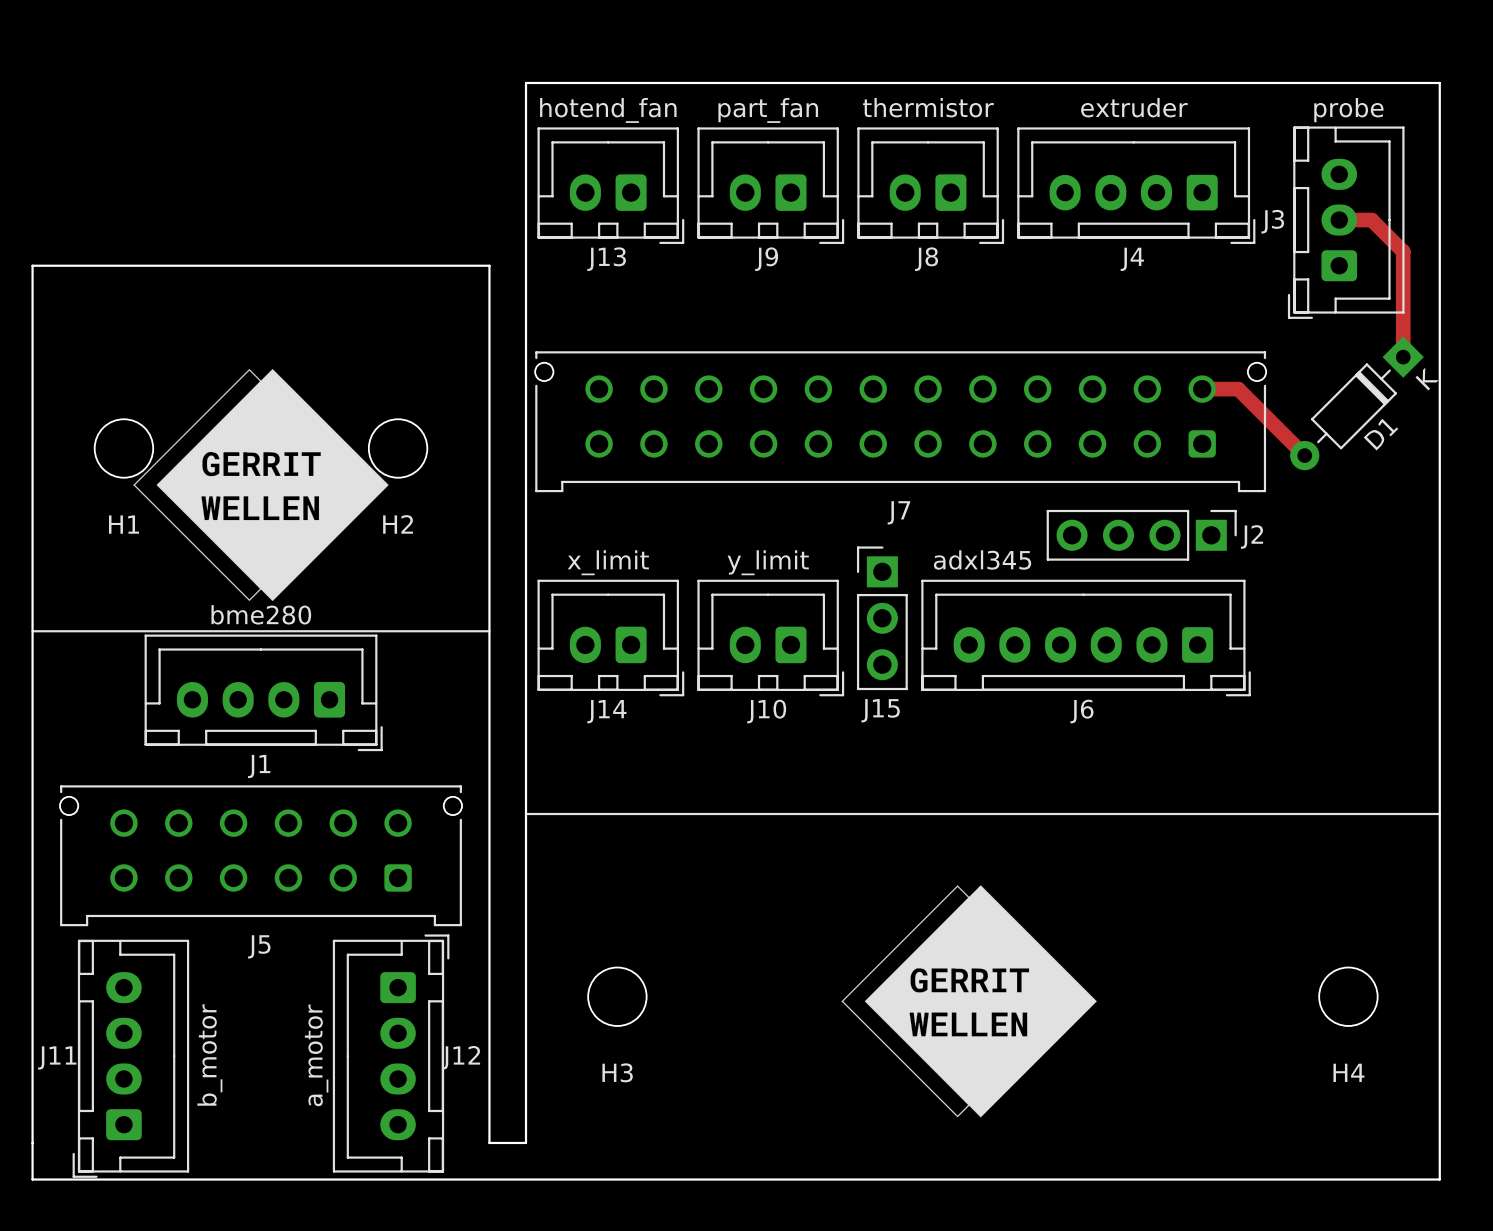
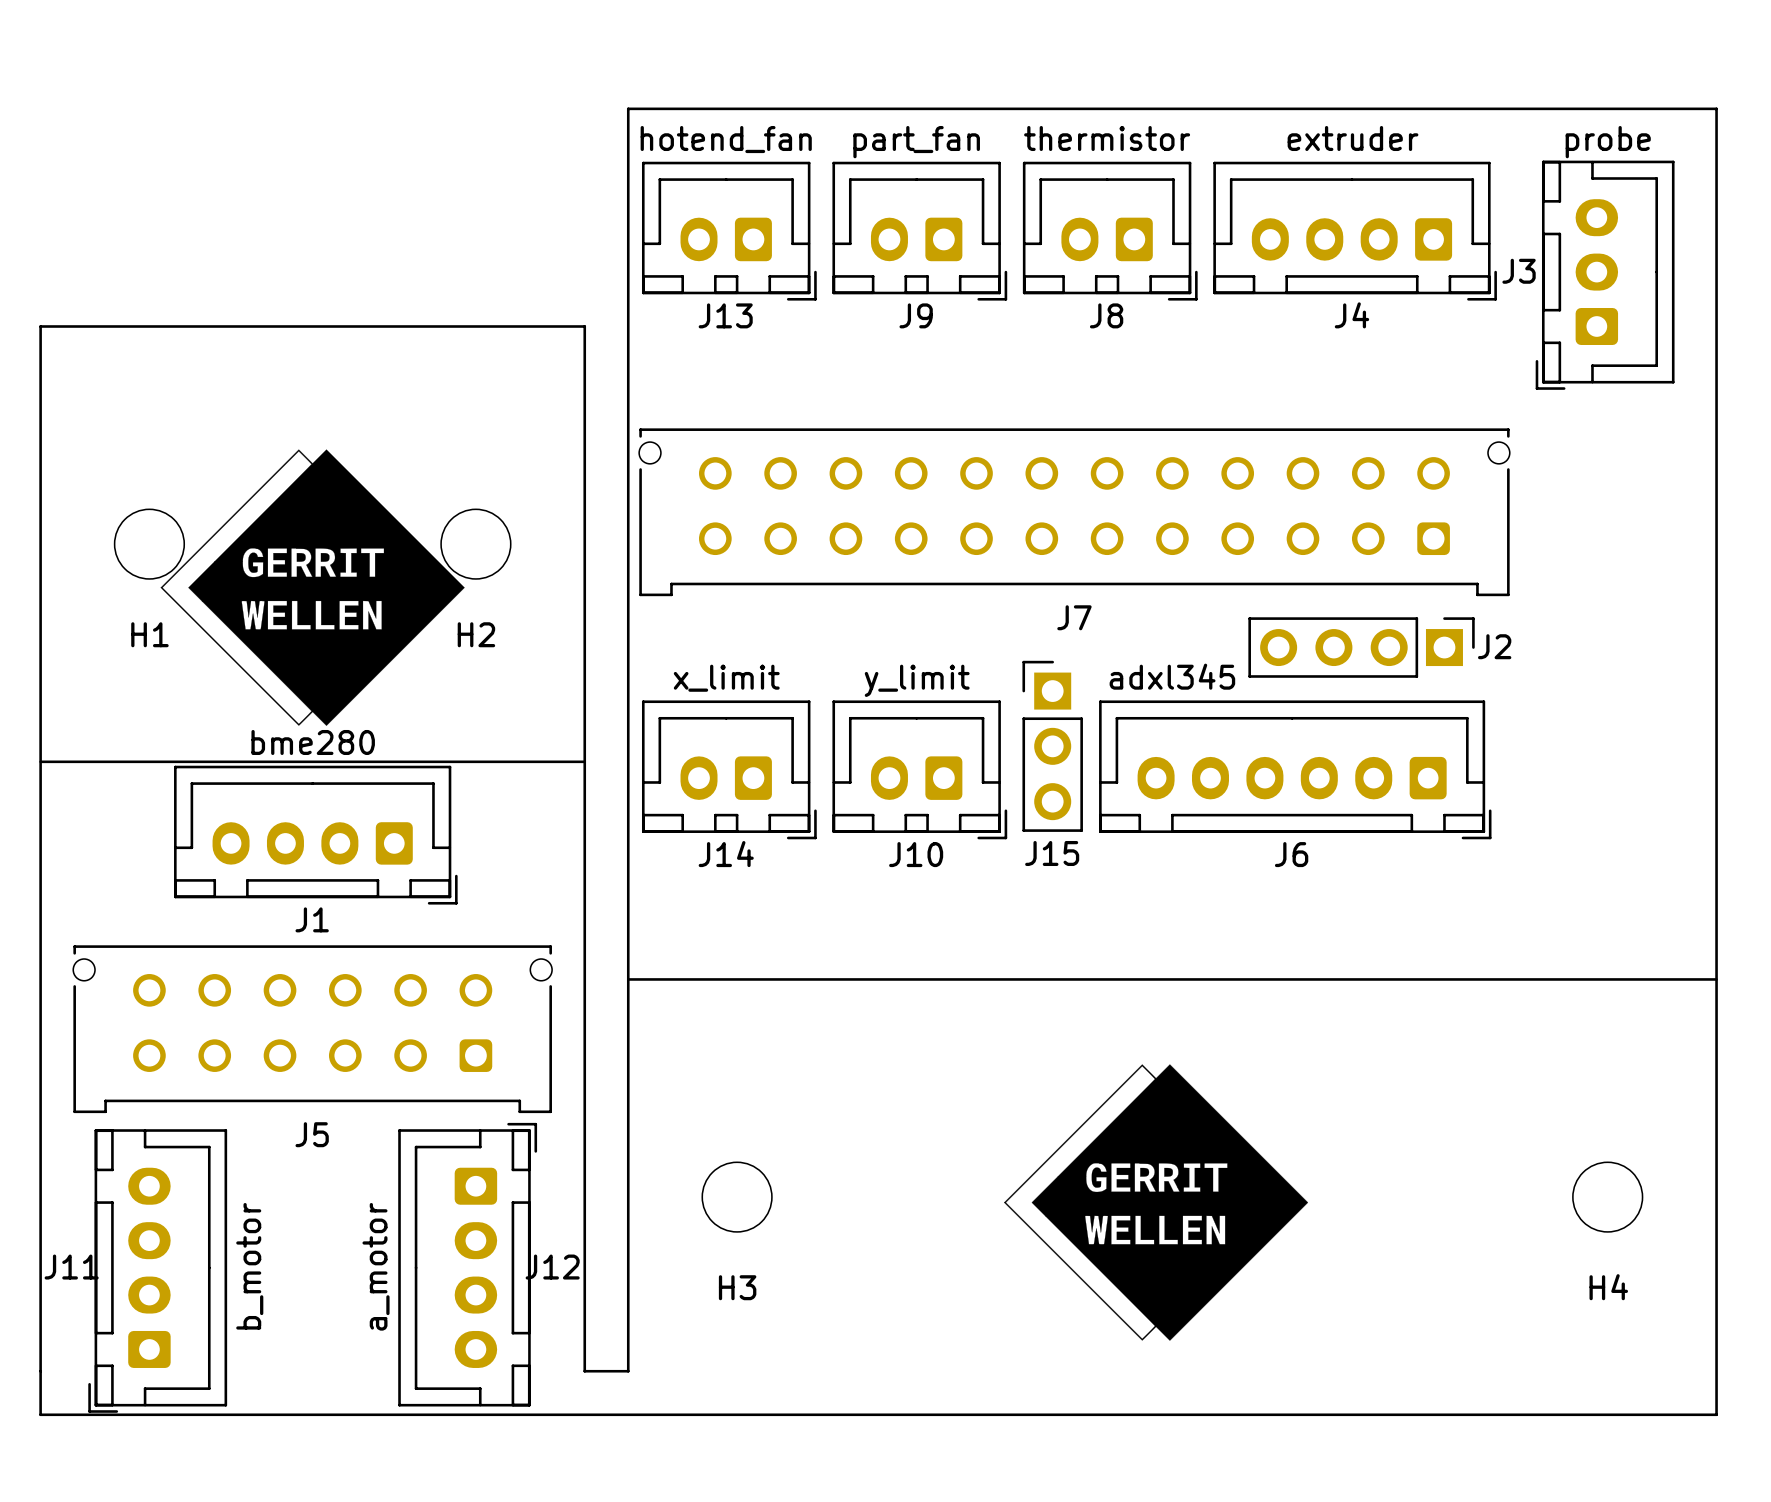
track: (1339, 220) (1371, 220) (1403, 251) (1403, 357) -> none
track: (1202, 389) (1238, 389) (1304, 455) -> none
D1: (1357, 403) -> none

